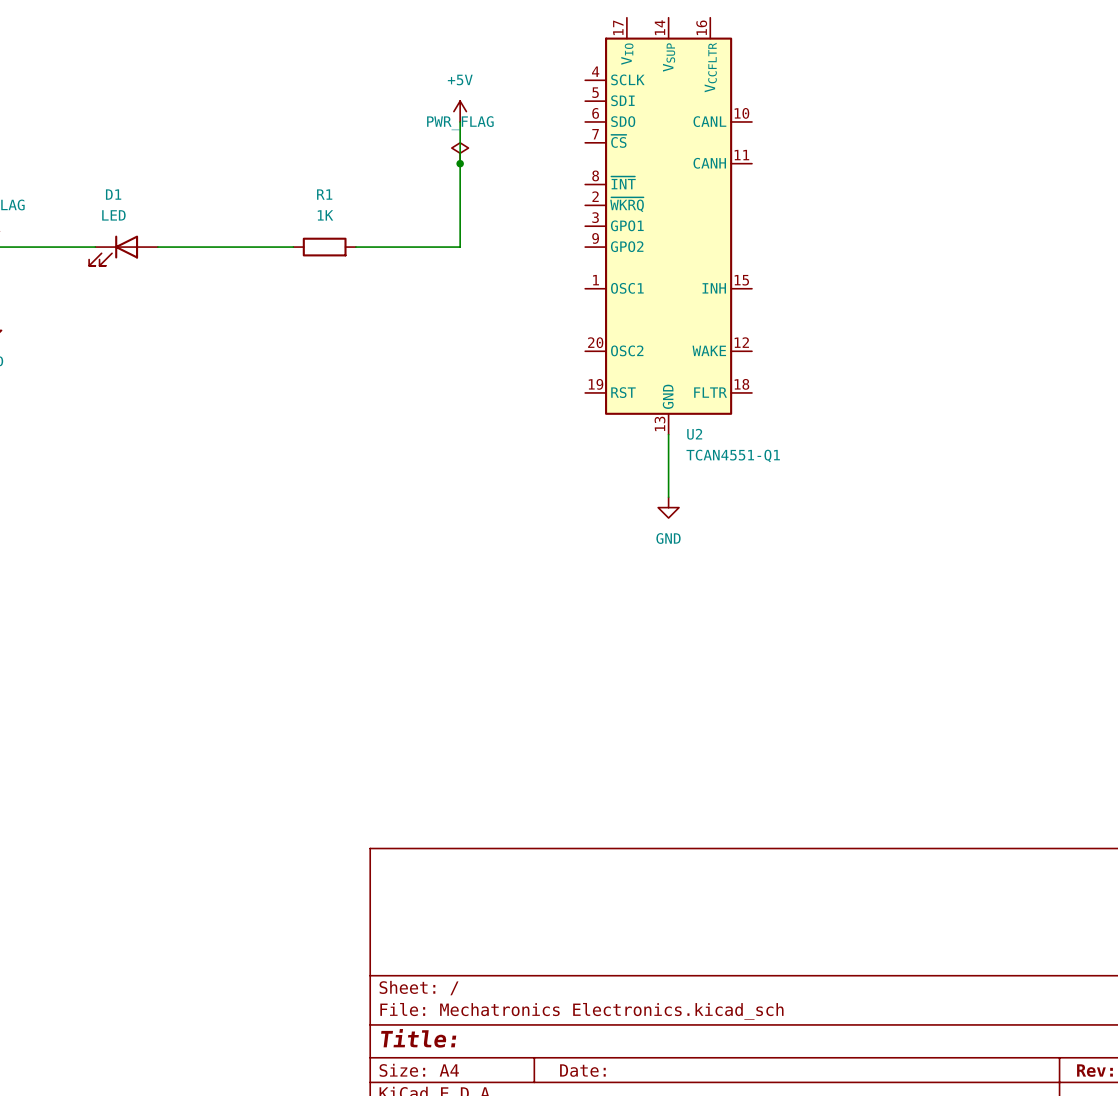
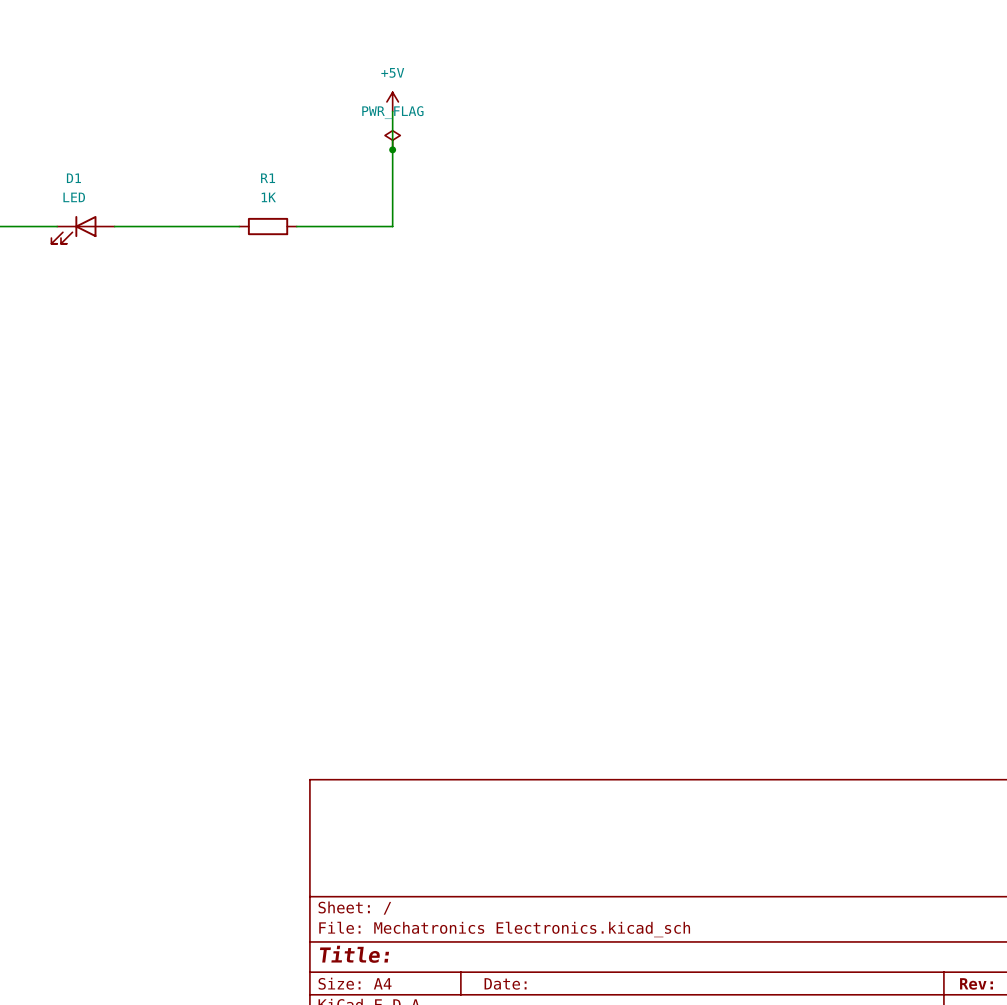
U2: TCAN4551-Q1 (668, 226) -> none
wire: (668, 434) (668, 497) -> none
power symbol: GND (668, 507) -> none

